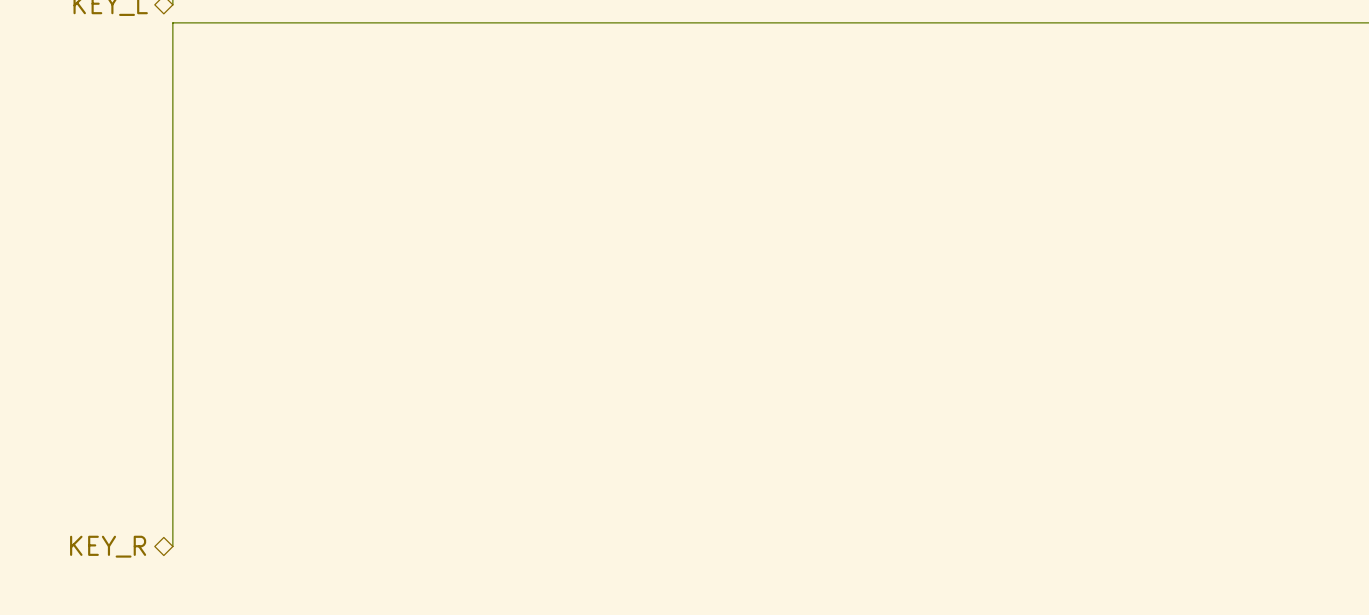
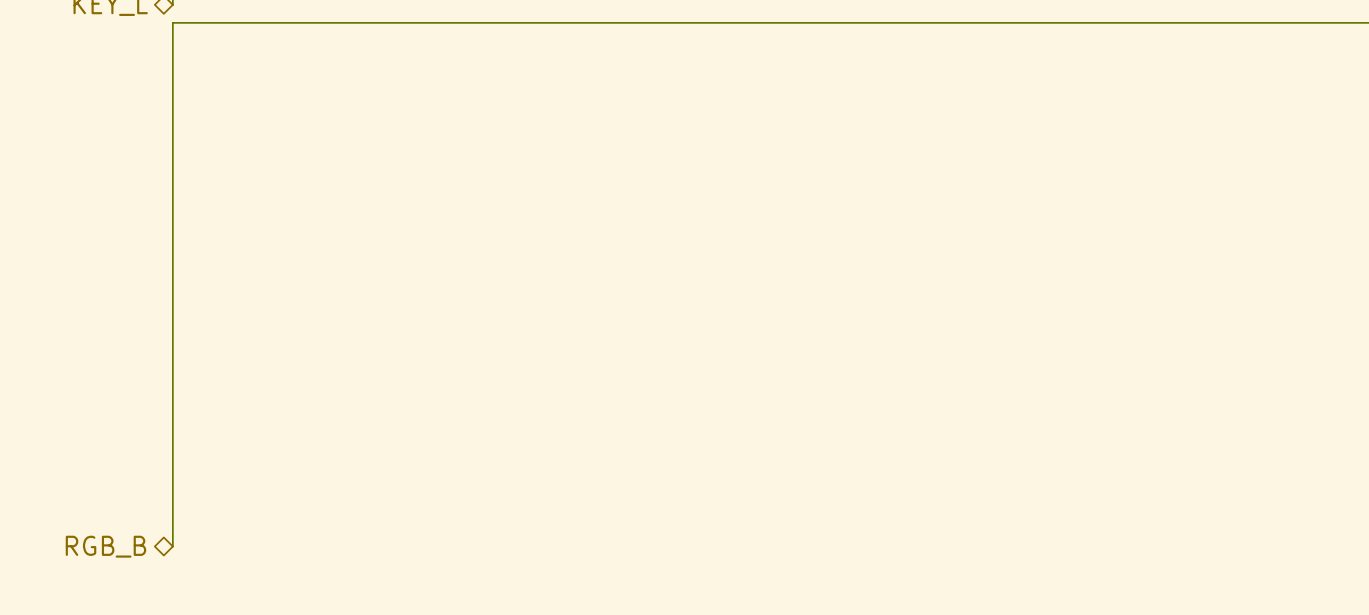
hierarchical label: KEY_R (108, 546) -> RGB_B (105, 546)

